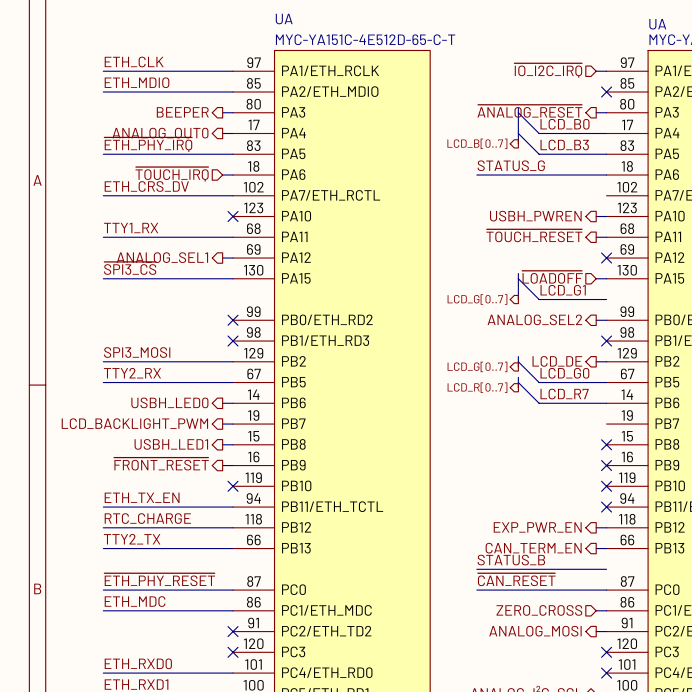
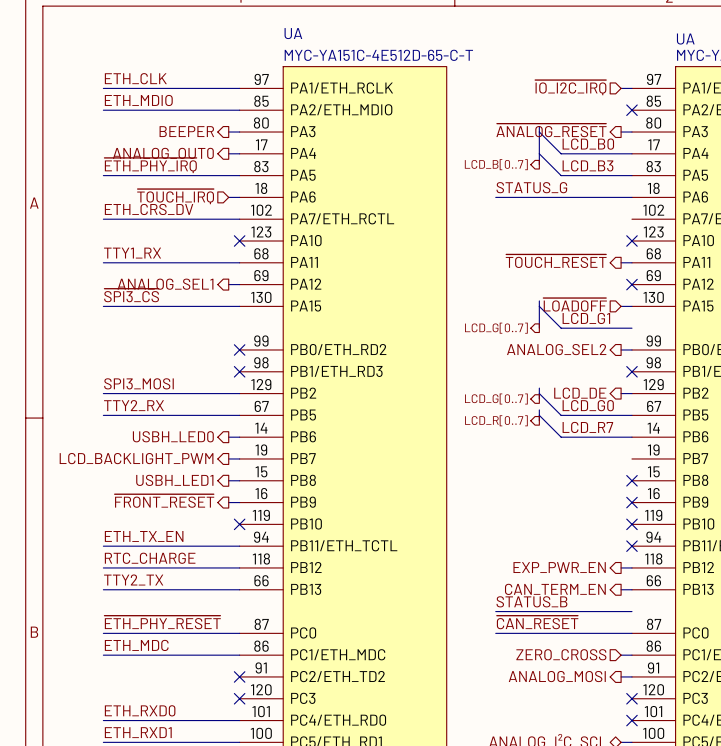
hierarchical label: USBH_PWREN (535, 216) -> none
wire: (596, 216) (606, 216) -> none
no-connect mark: none -> (631, 241)

